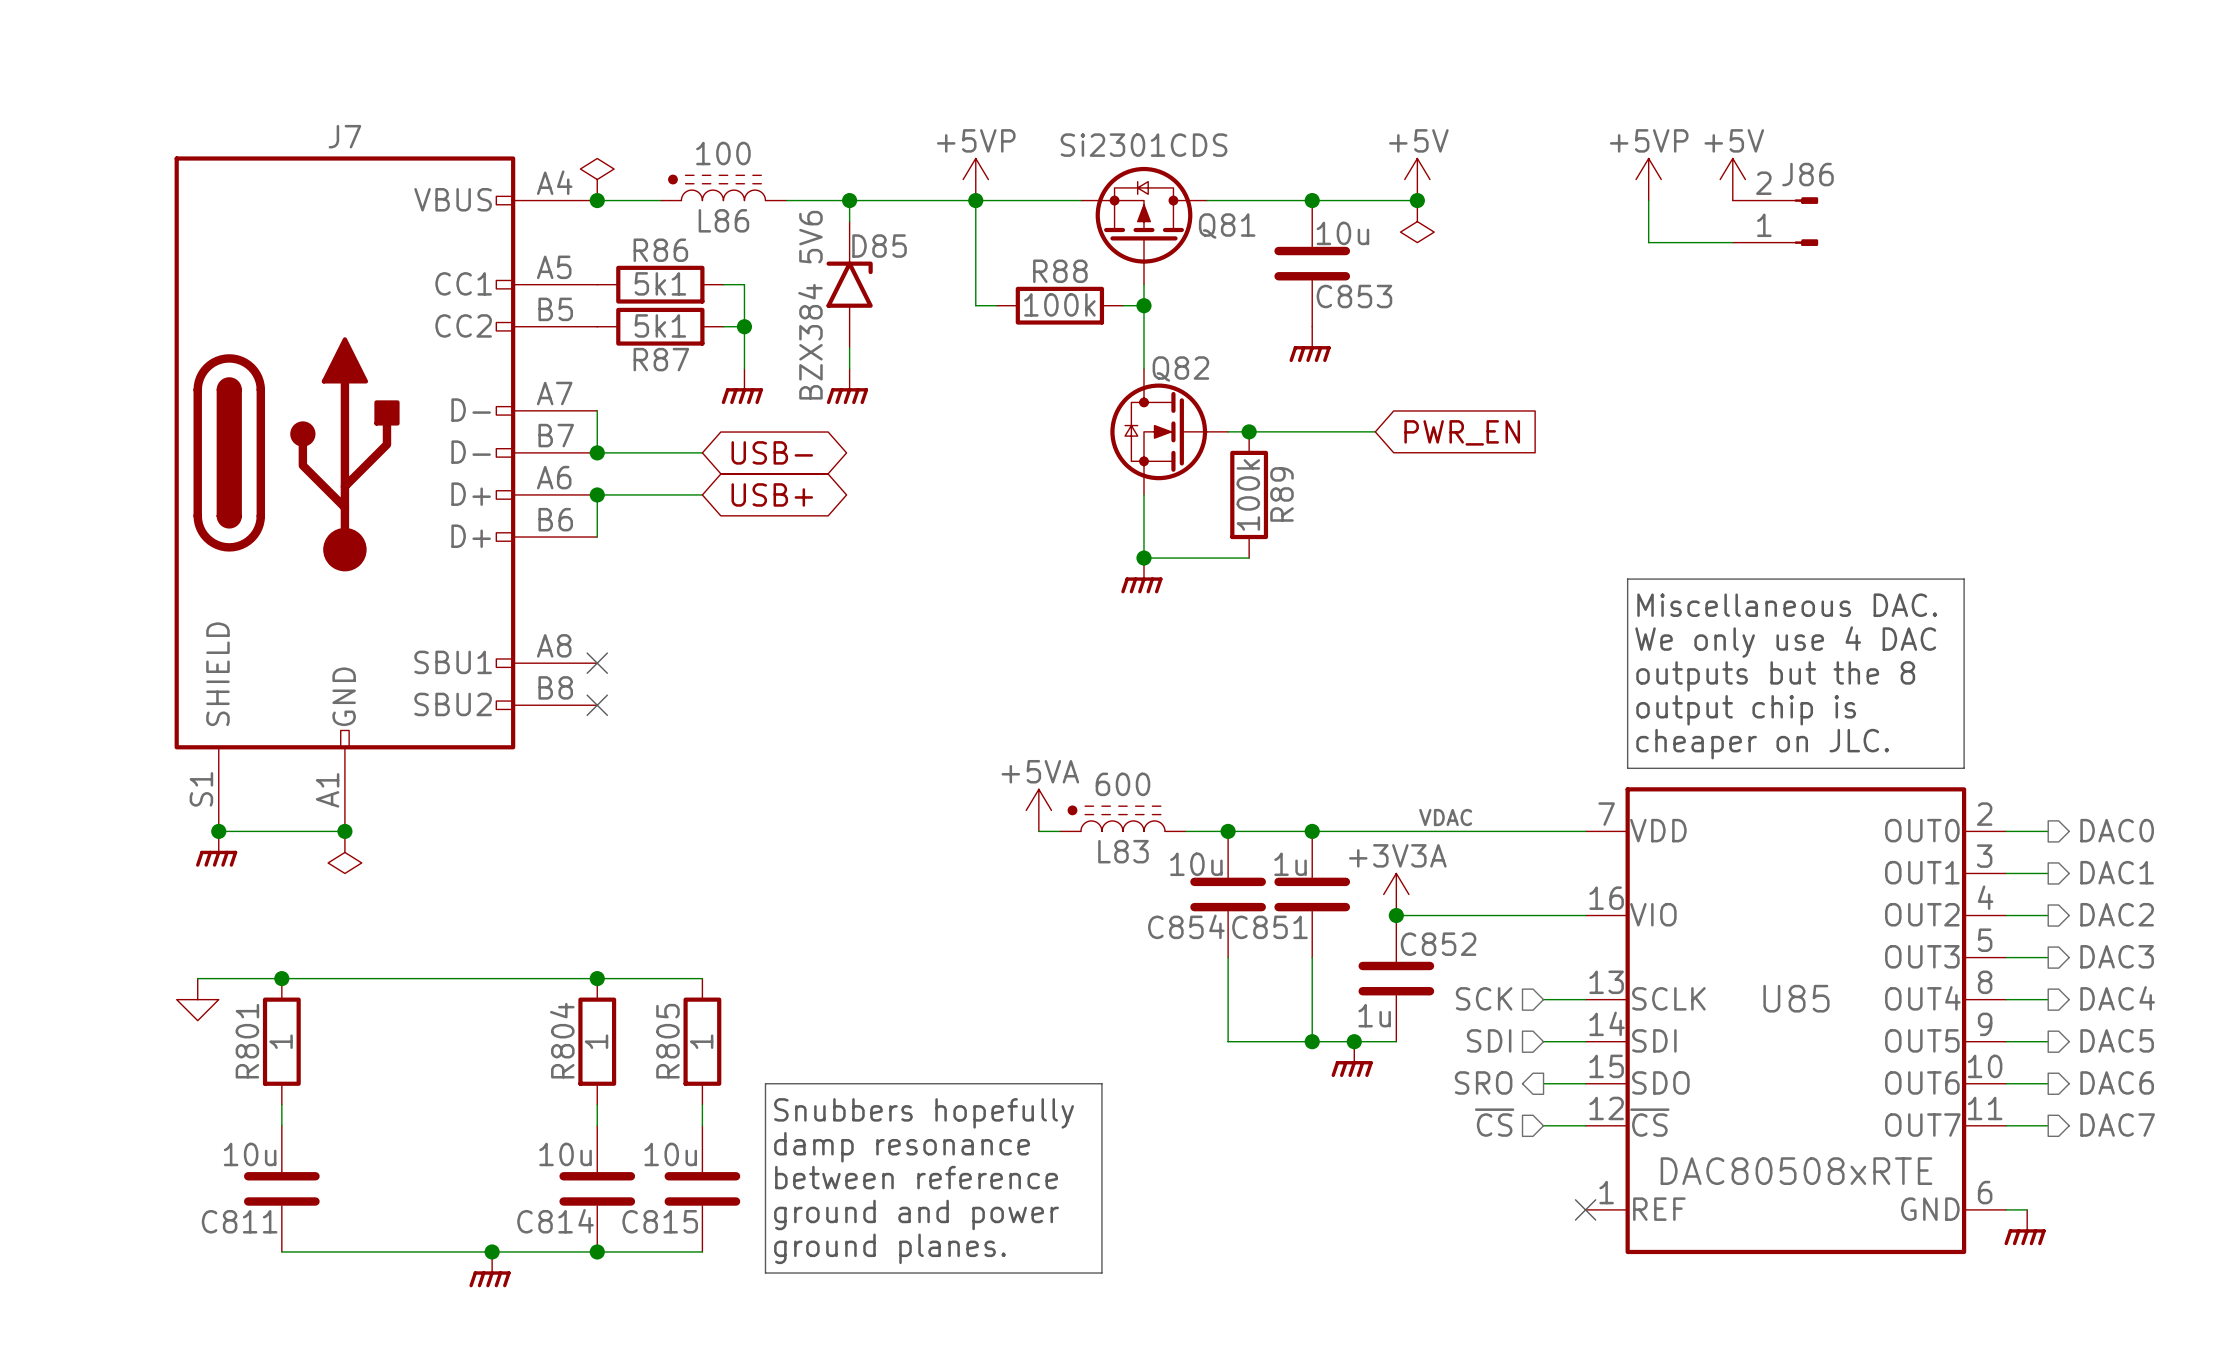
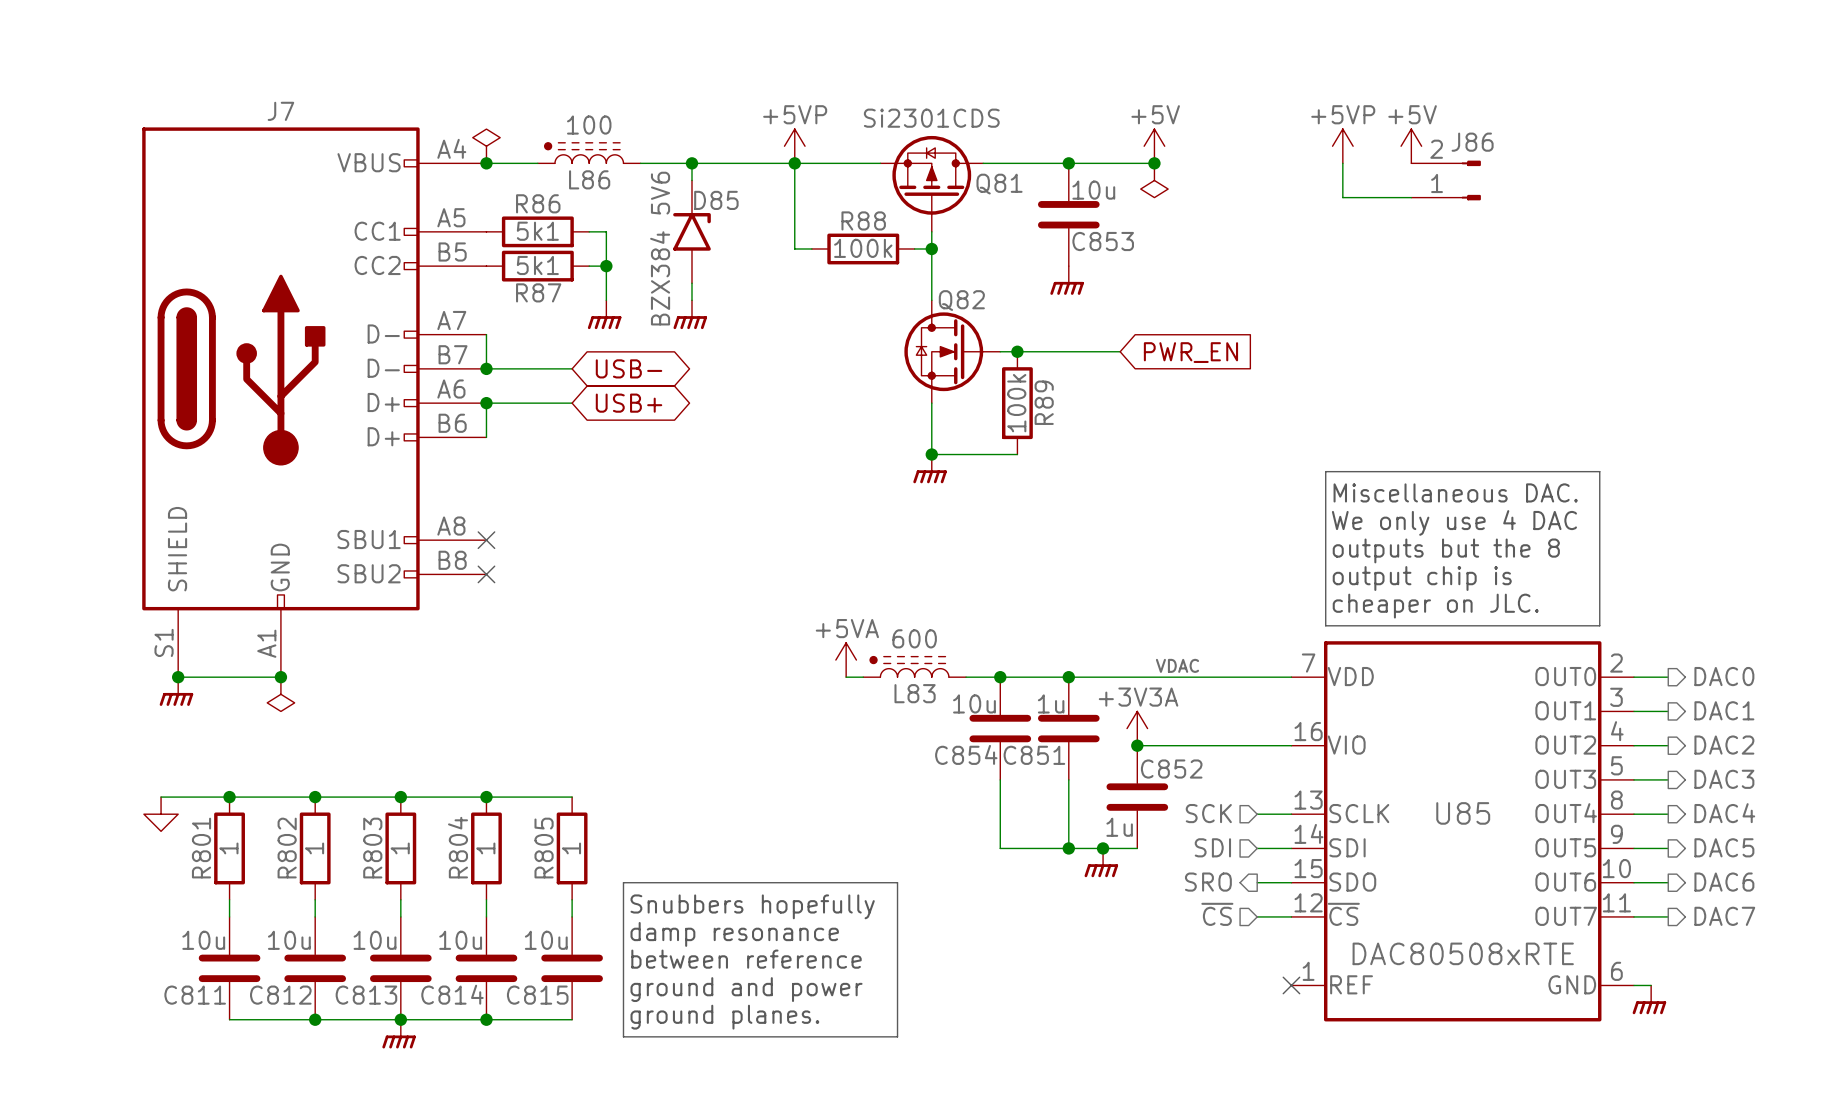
junction: none -> (315, 797)
junction: none -> (400, 797)
R802: none -> 1 (315, 848)
R803: none -> 1 (400, 848)
wire: none -> (315, 899) (315, 916)
wire: none -> (400, 899) (400, 916)
C812: none -> 10u (315, 968)
C813: none -> 10u (400, 968)
junction: none -> (315, 1019)

